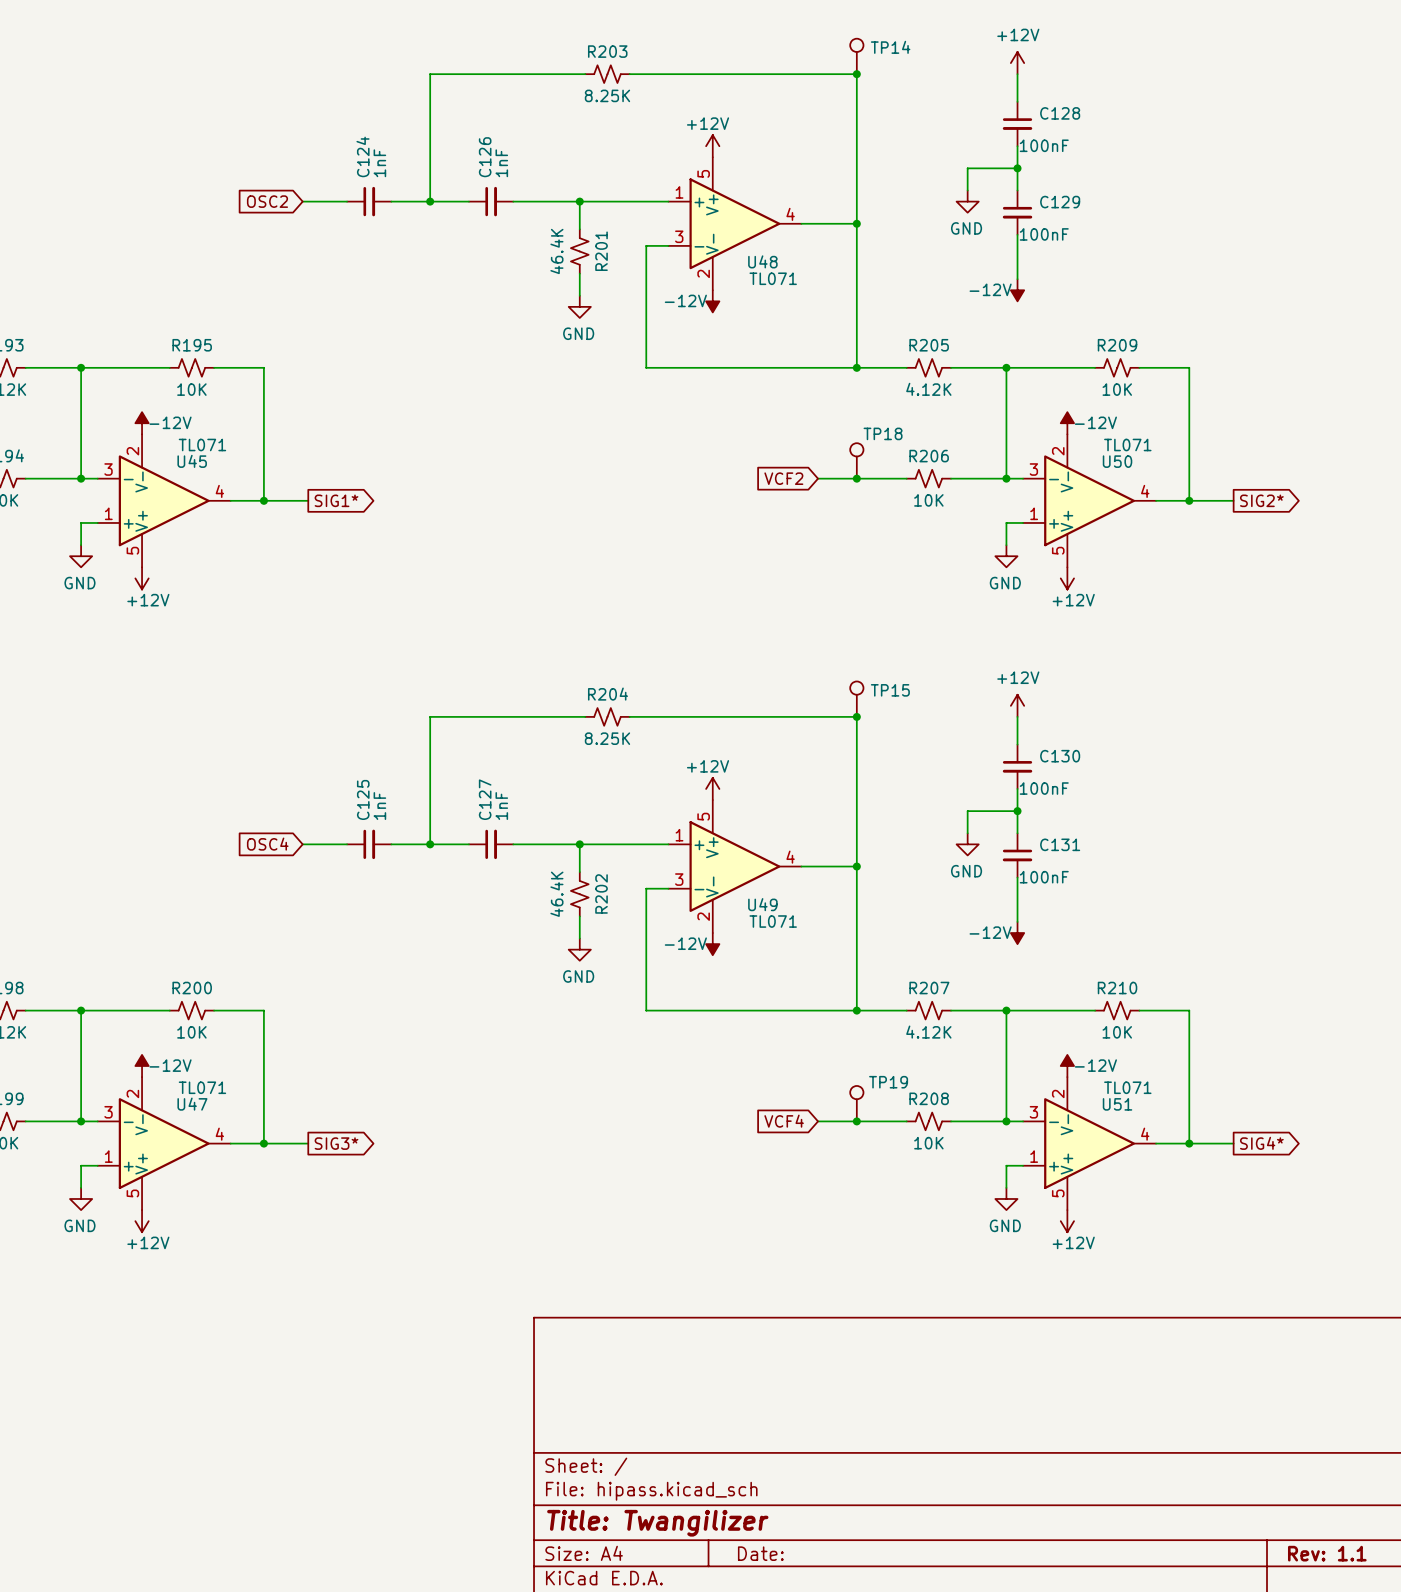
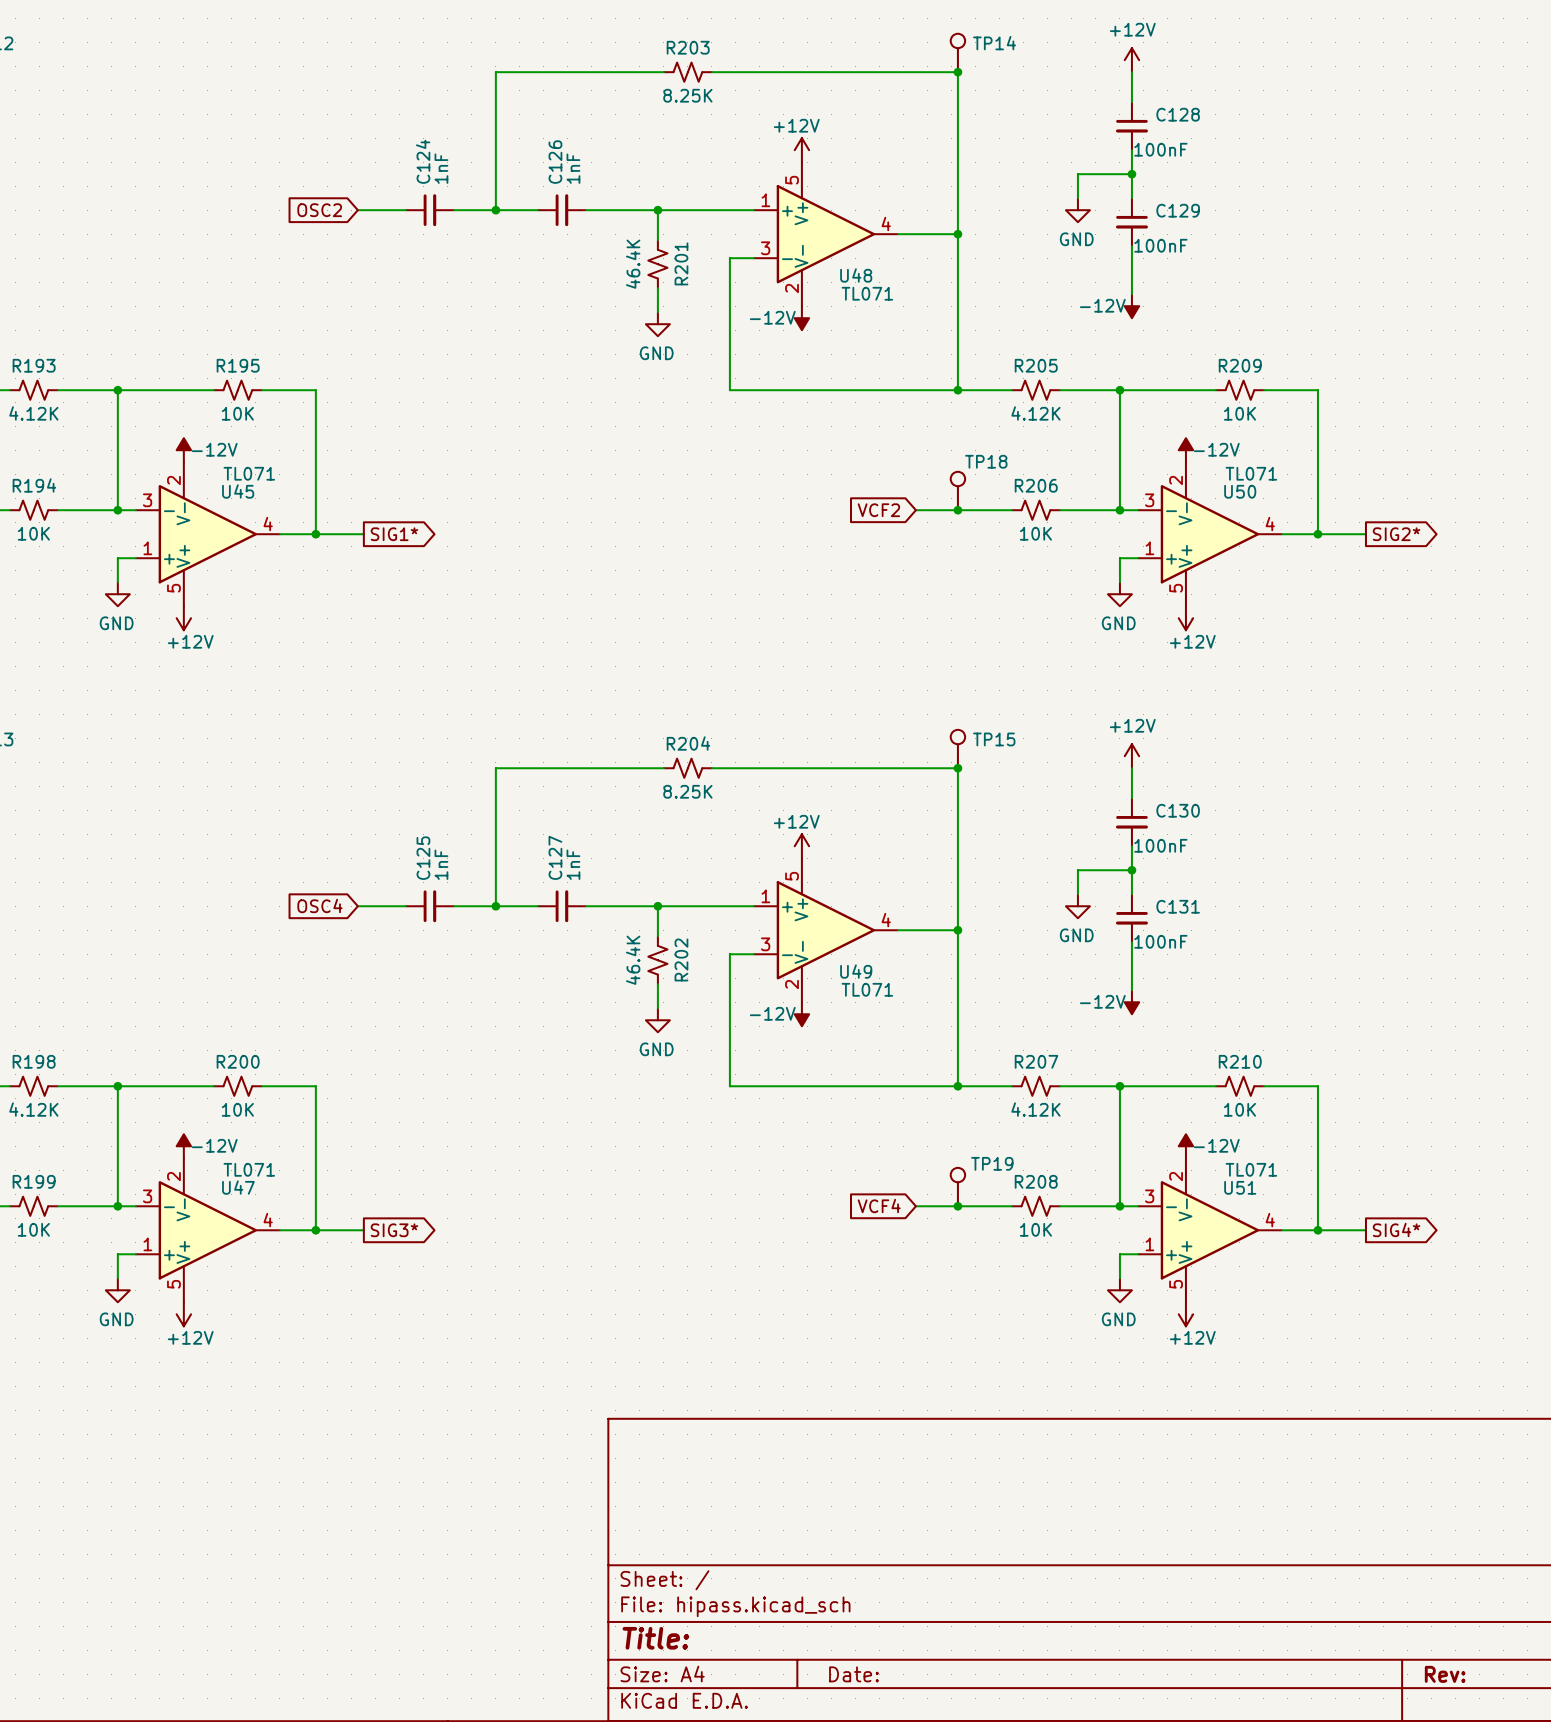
title block: Title: Twangilizer (657, 1523) -> Title: (655, 1638)
title block: Rev: 1.1 (1327, 1553) -> Rev: (1445, 1674)

